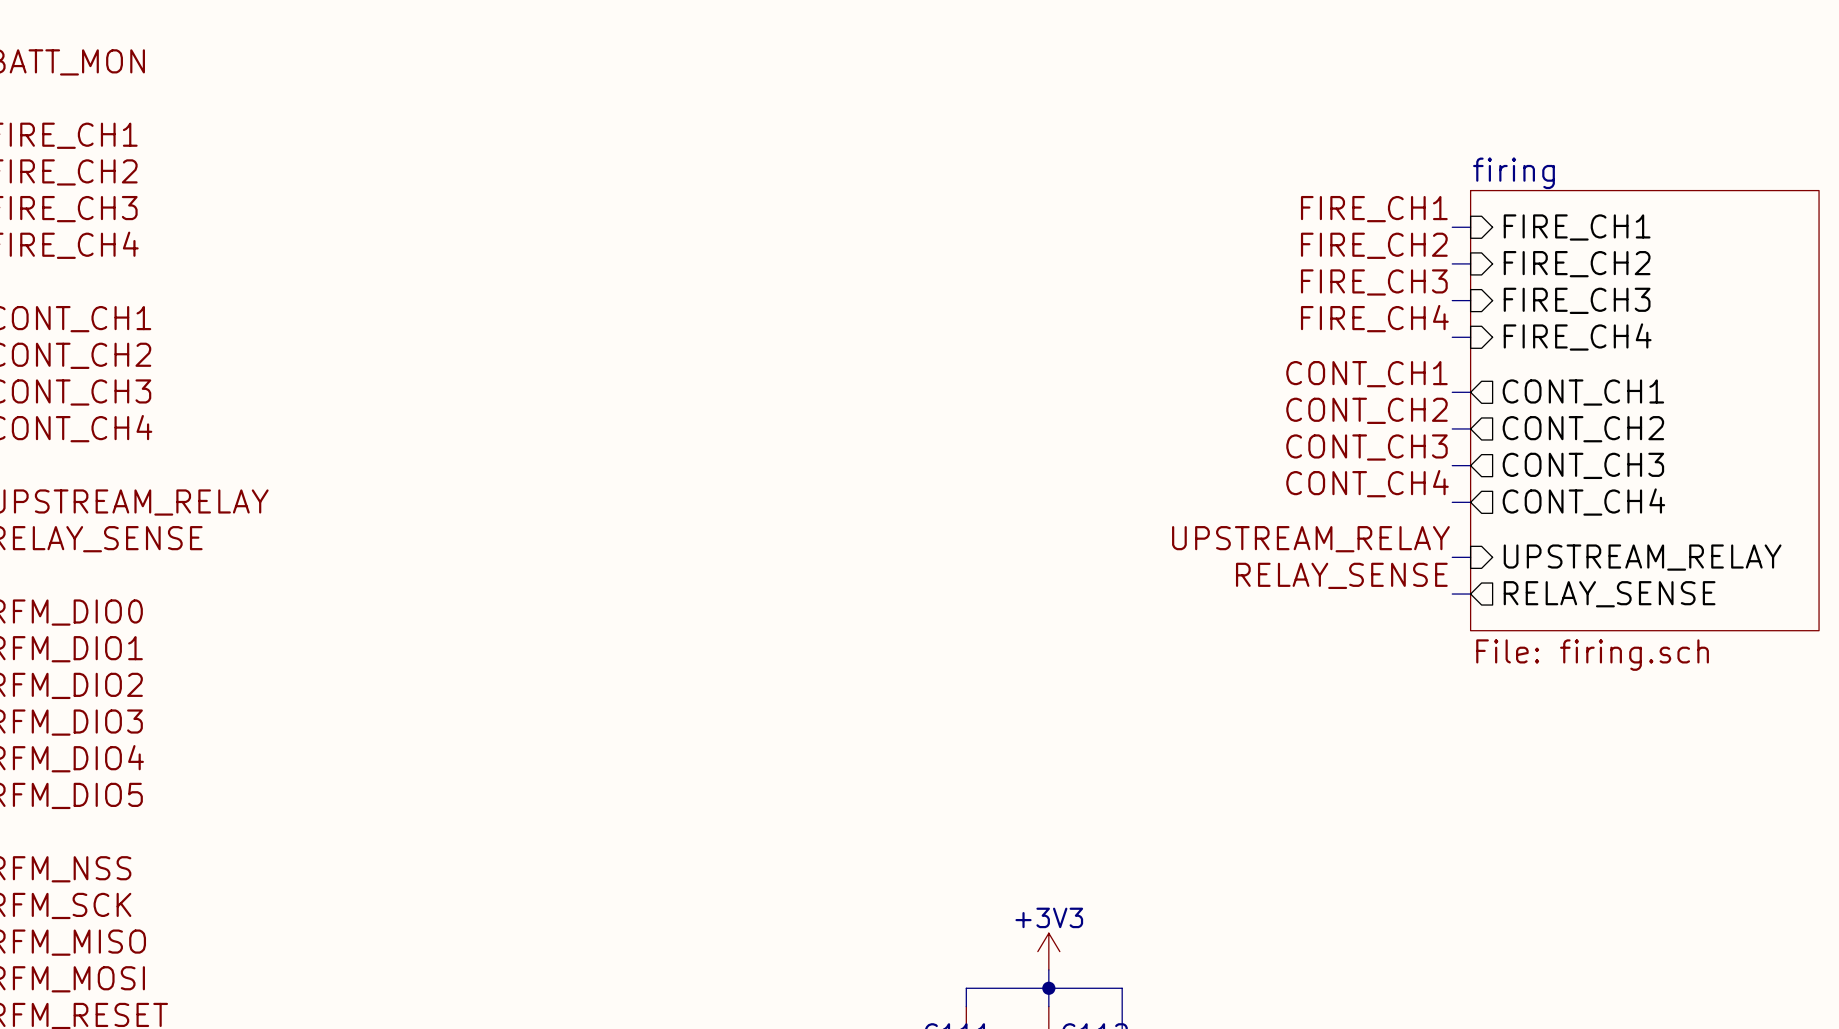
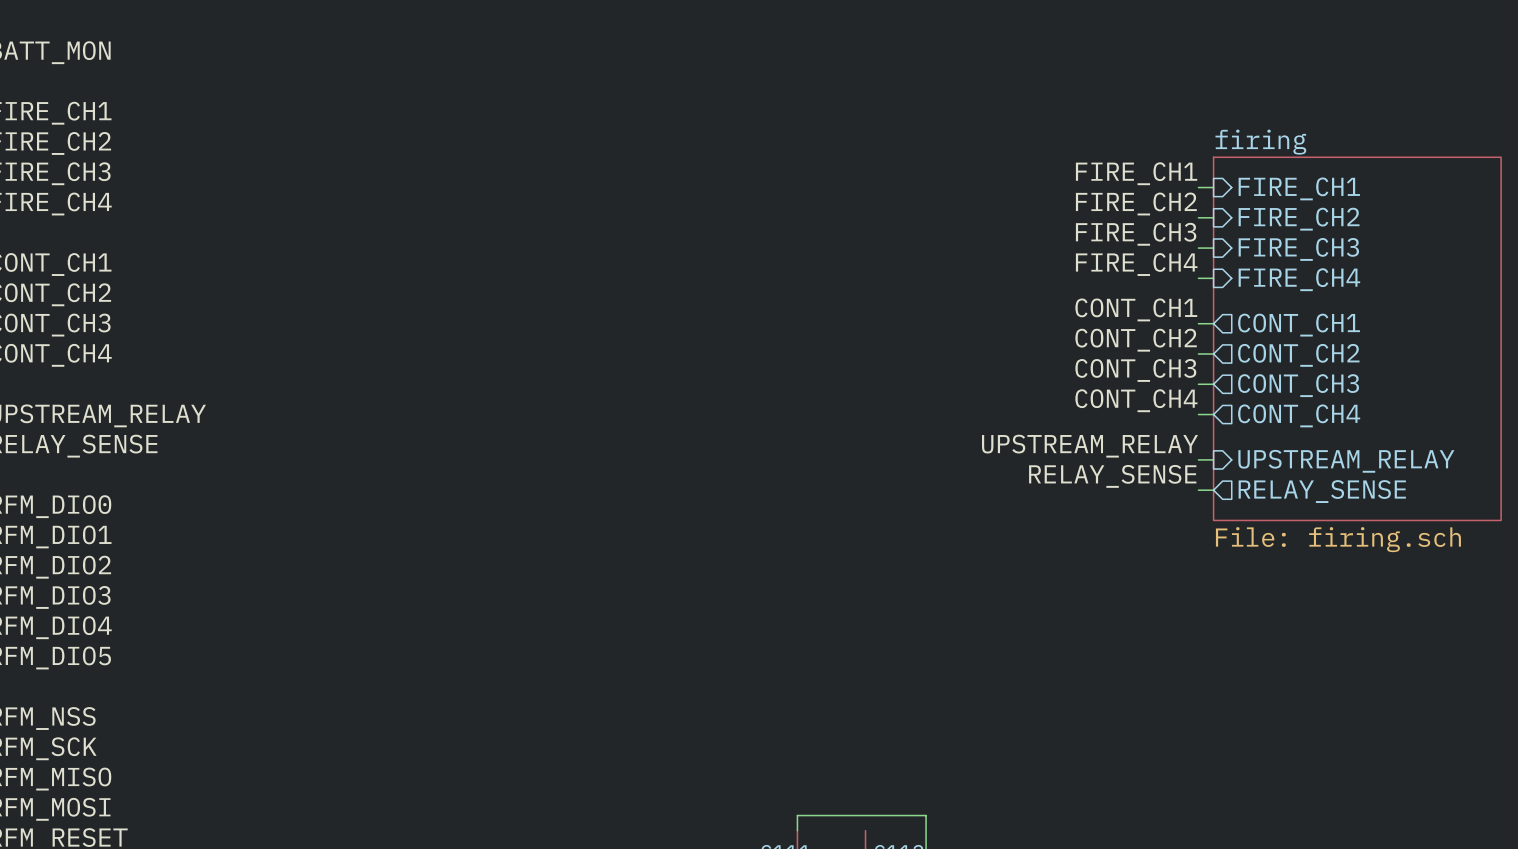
power symbol: +3V3 (1048, 951) -> none
wire: (1048, 969) (1048, 1006) -> none
junction: (1048, 988) -> none

